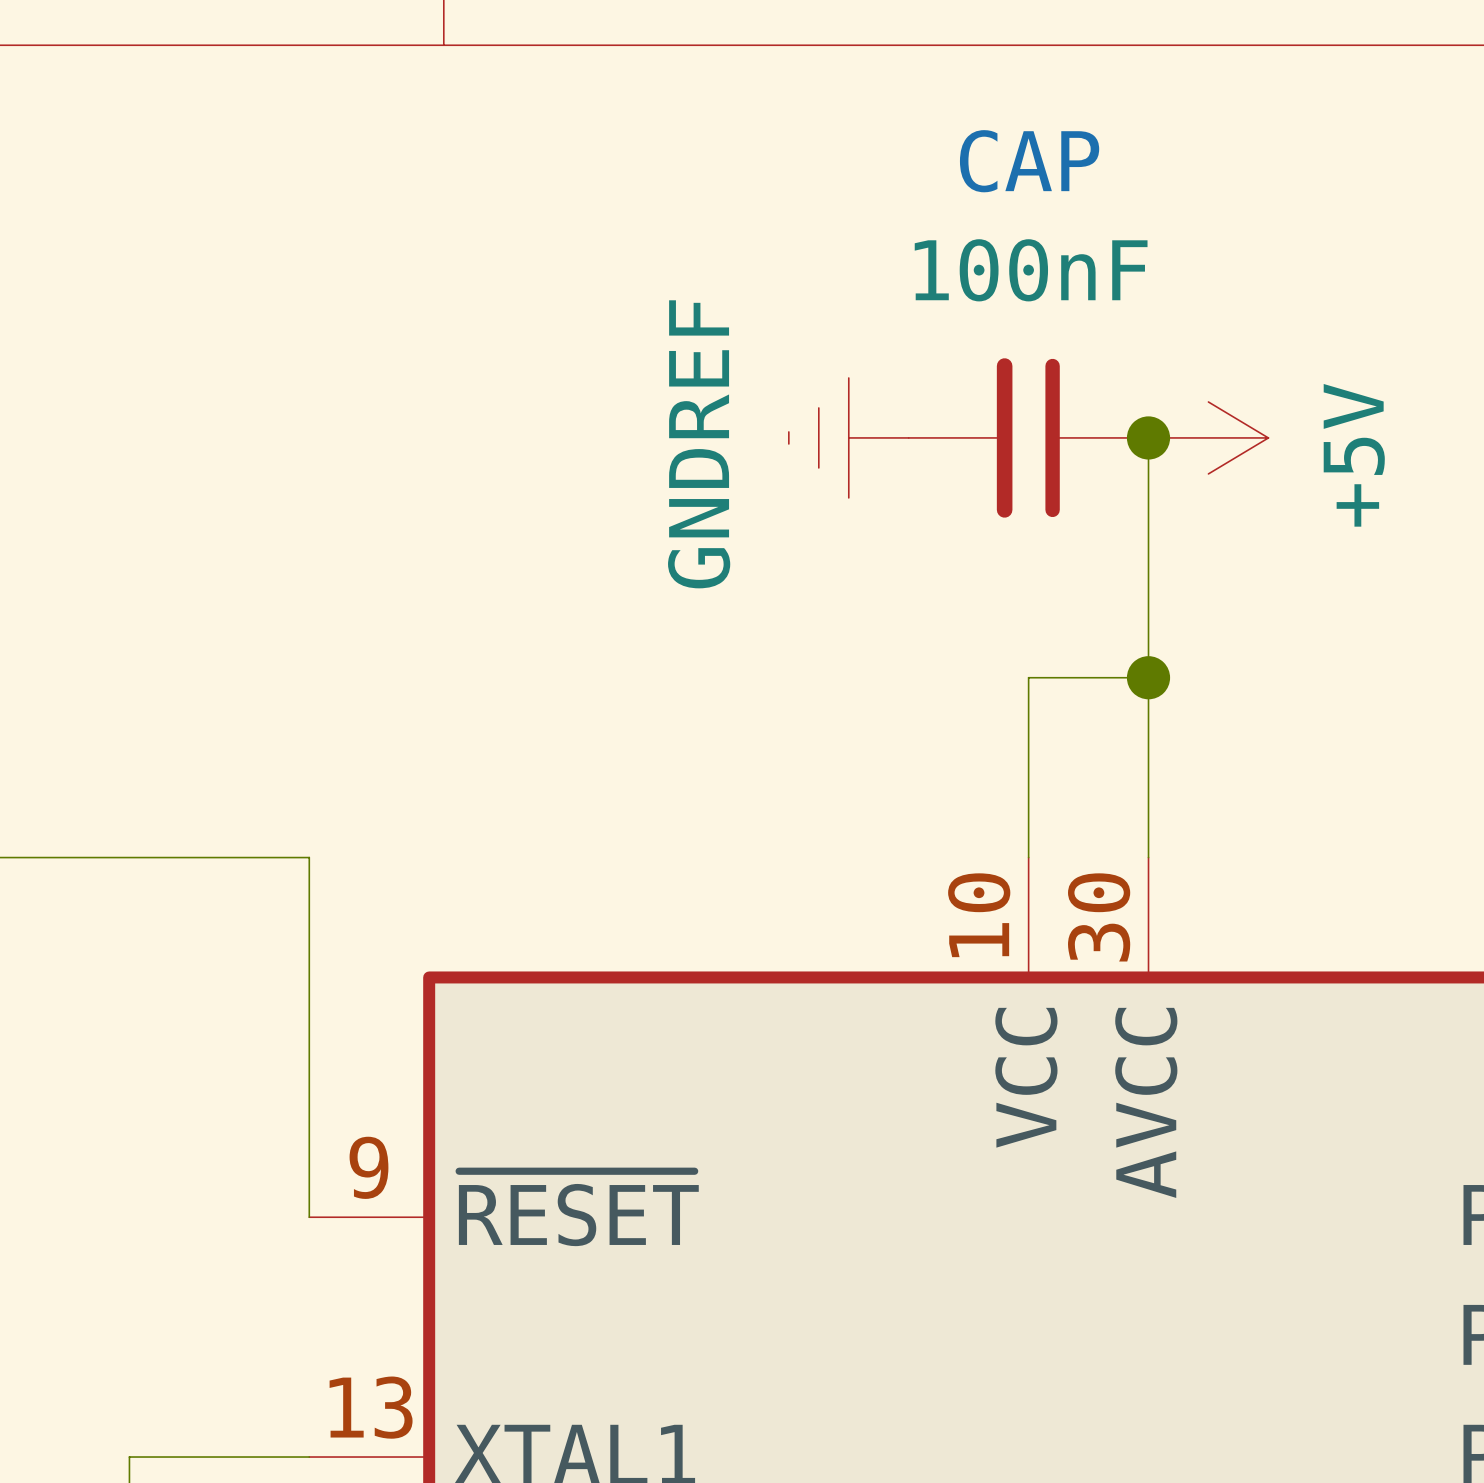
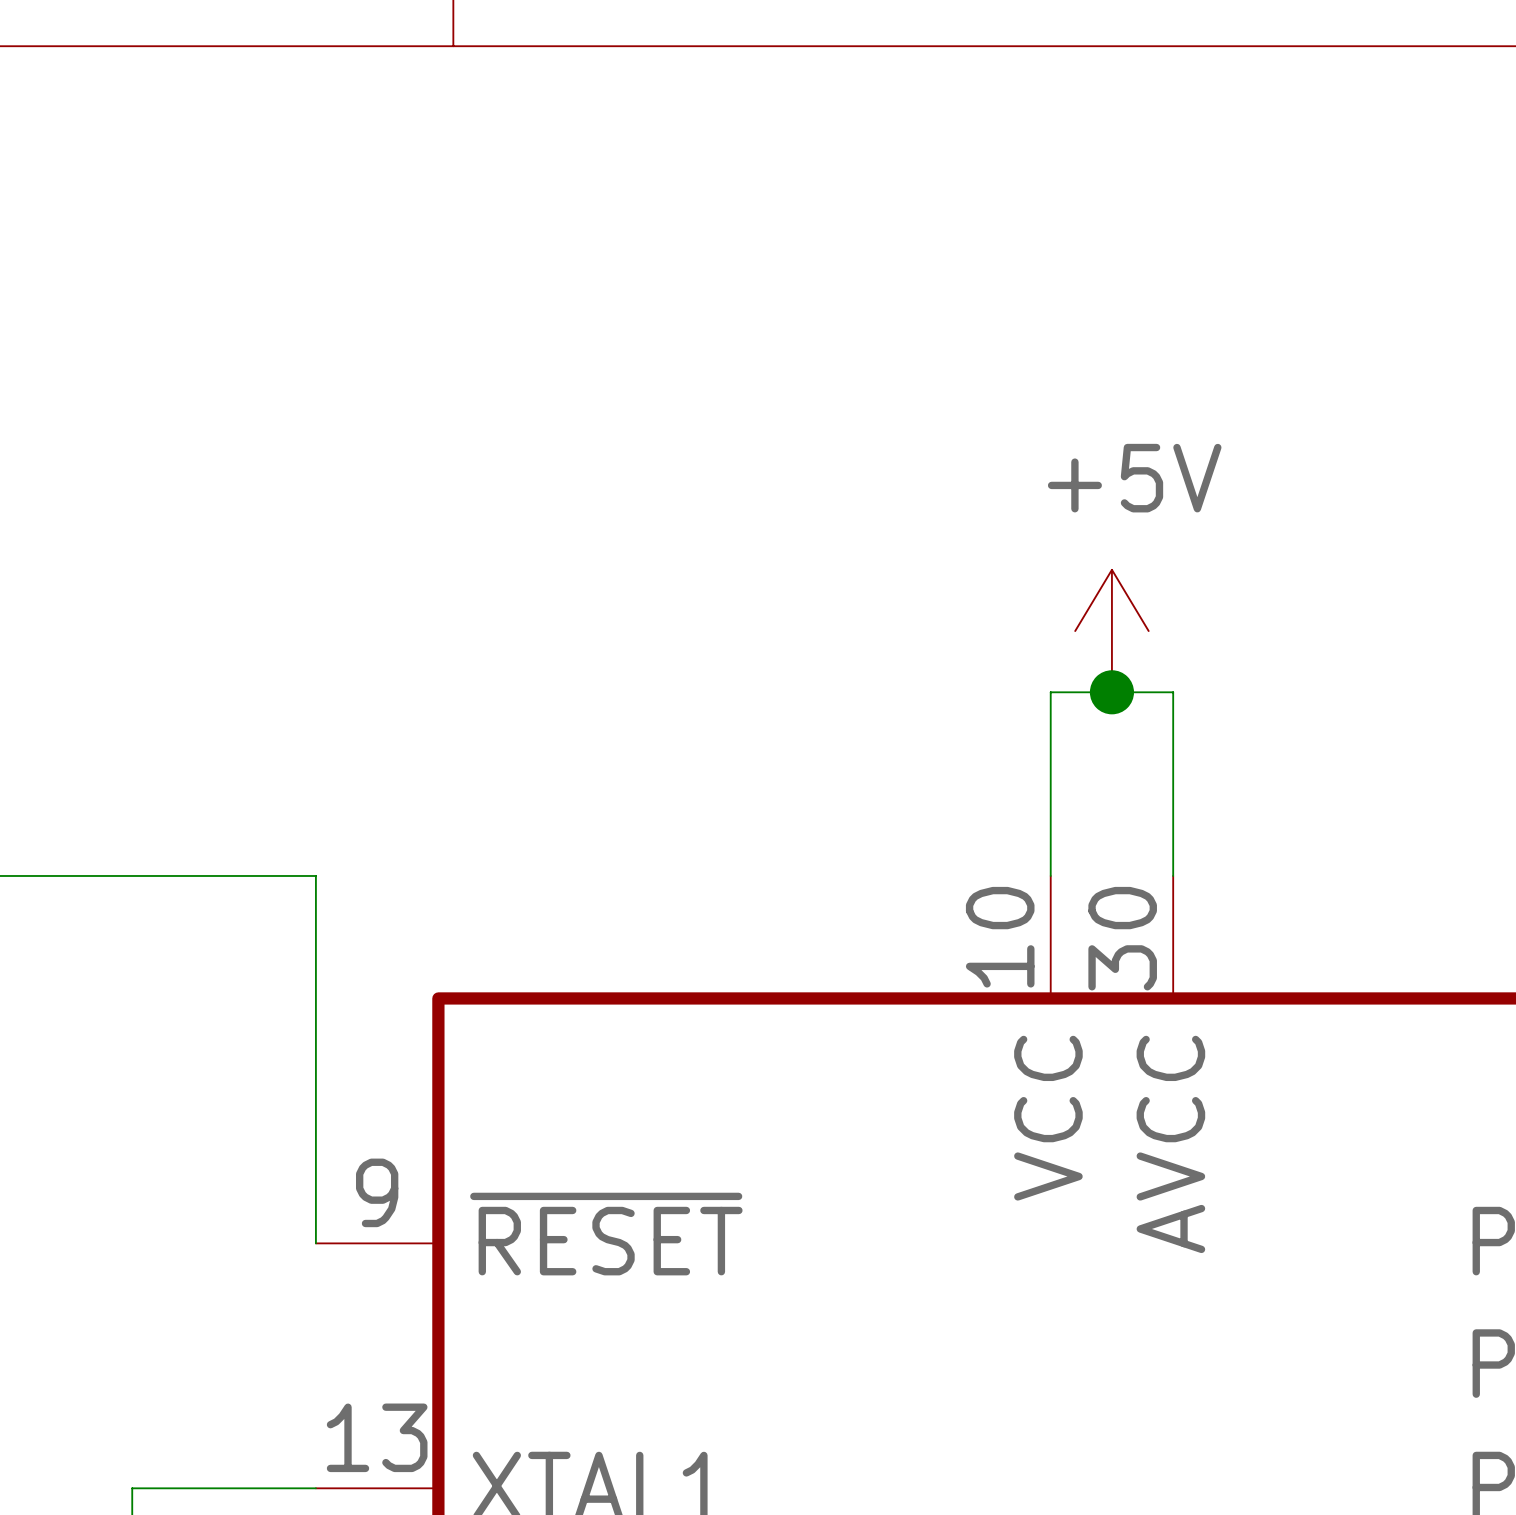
power symbol: GNDREF (848, 437) -> none
CAP: 100nF (1028, 437) -> none
wire: (1148, 437) (1148, 677) -> none
junction: (1148, 437) -> none
power symbol rotation: 0° (1208, 437) -> 90° counterclockwise (1111, 631)
power symbol position: +5V (1208, 437) -> +5V (1111, 631)
junction position: (1148, 677) -> (1111, 692)

